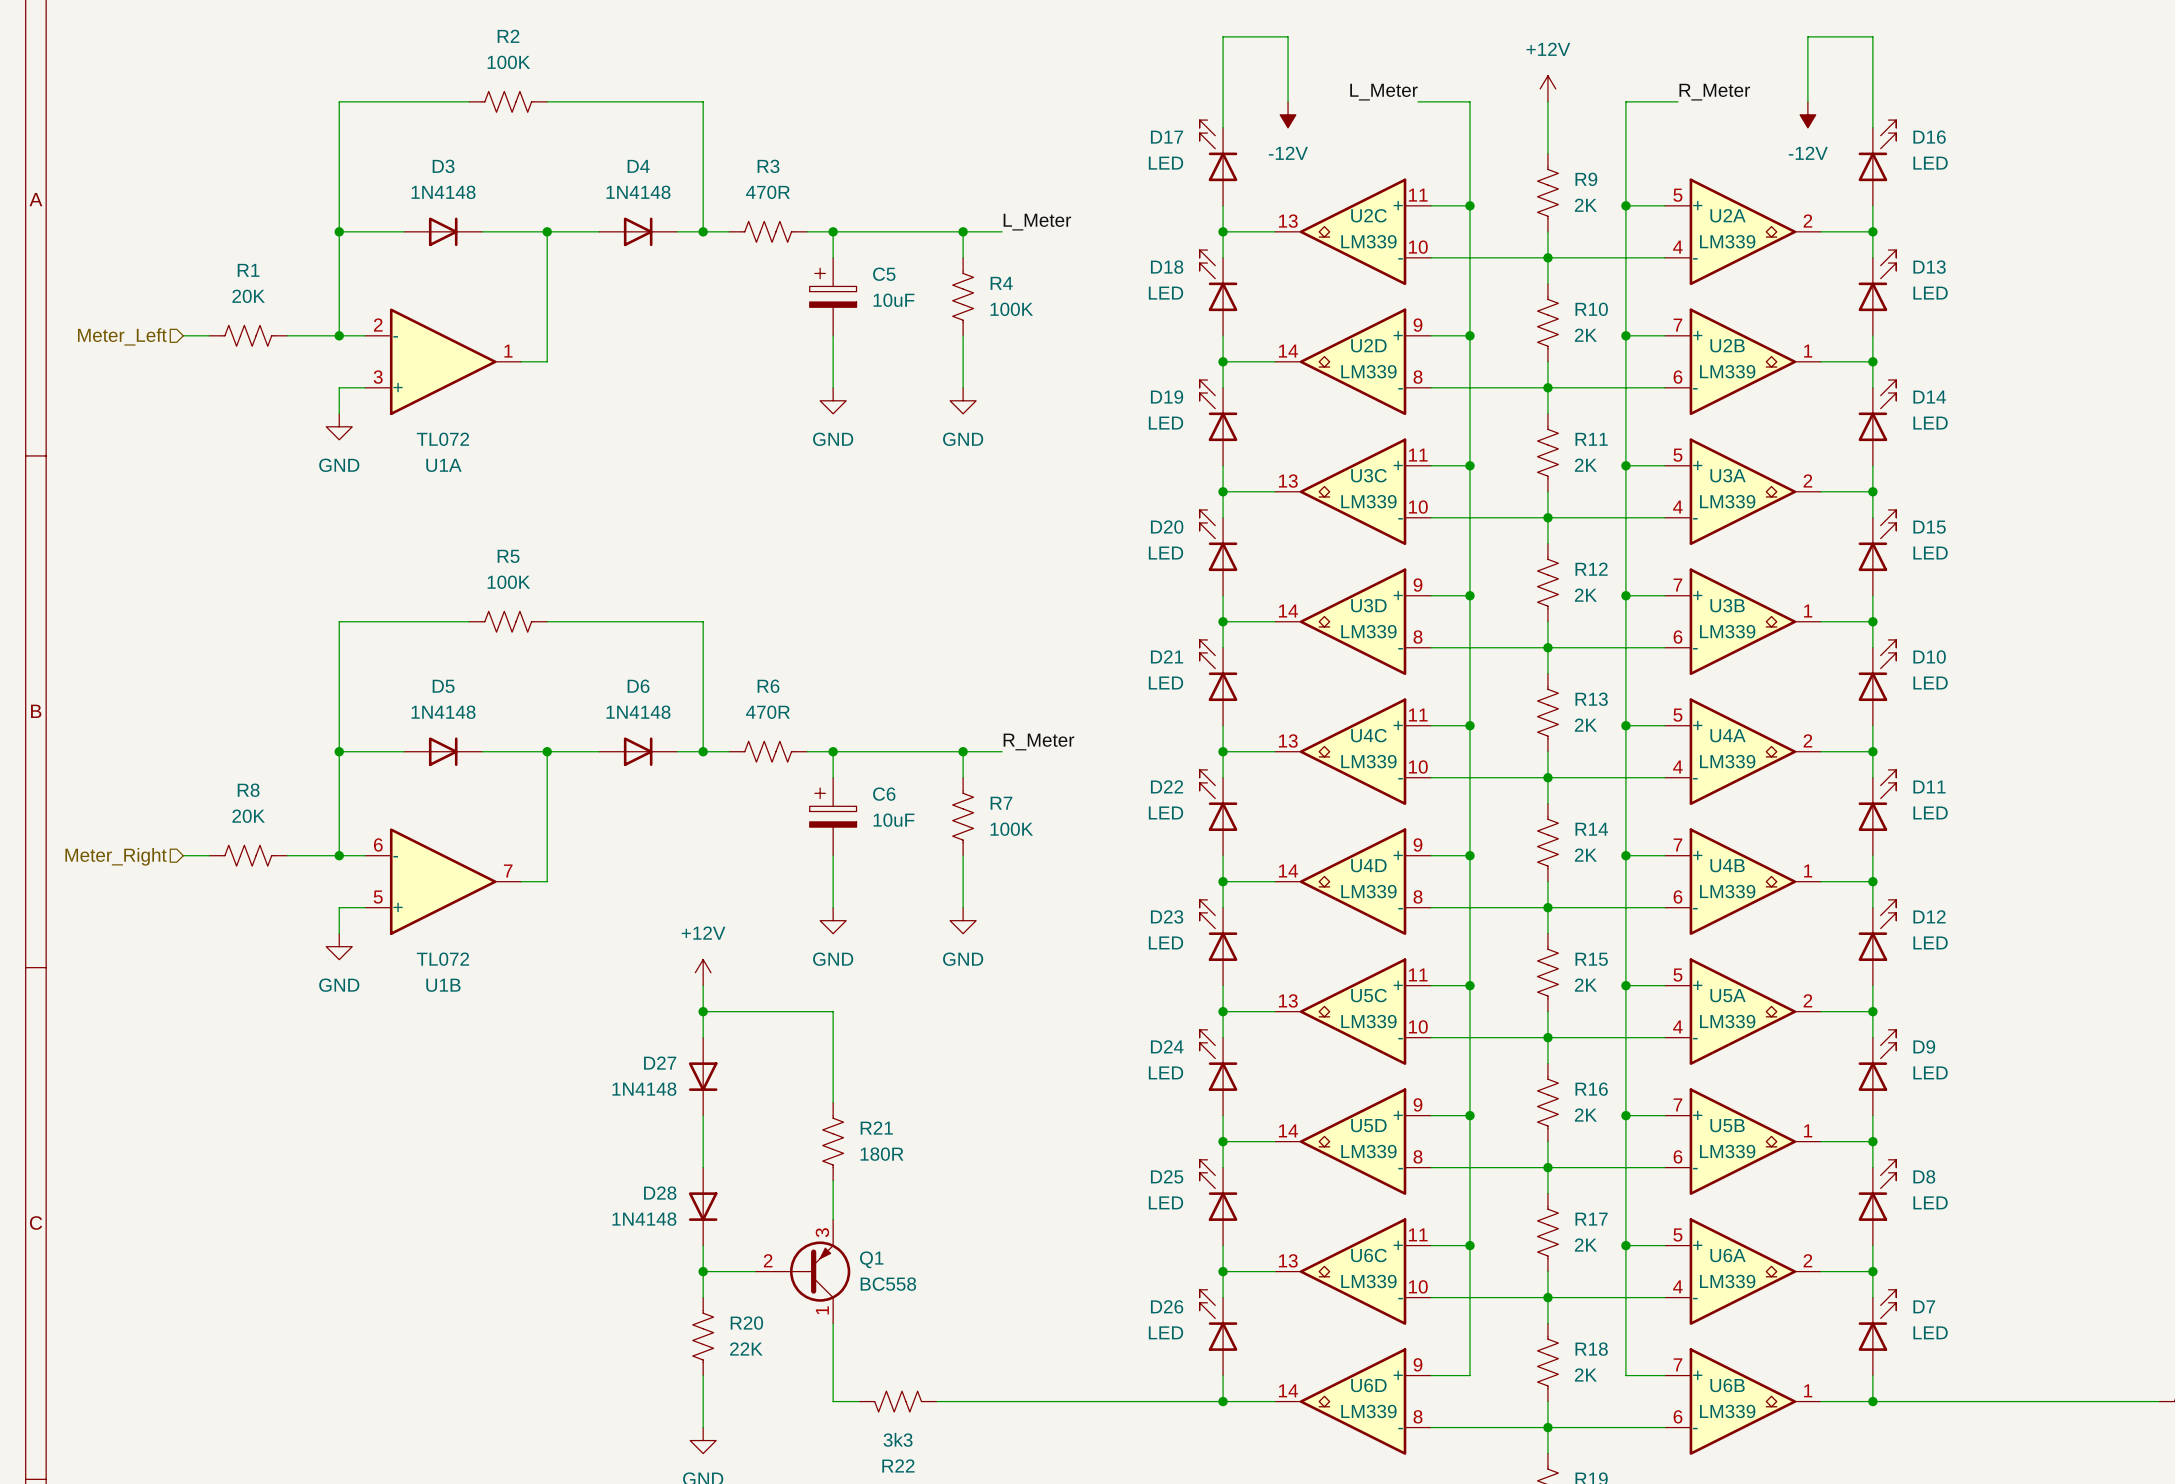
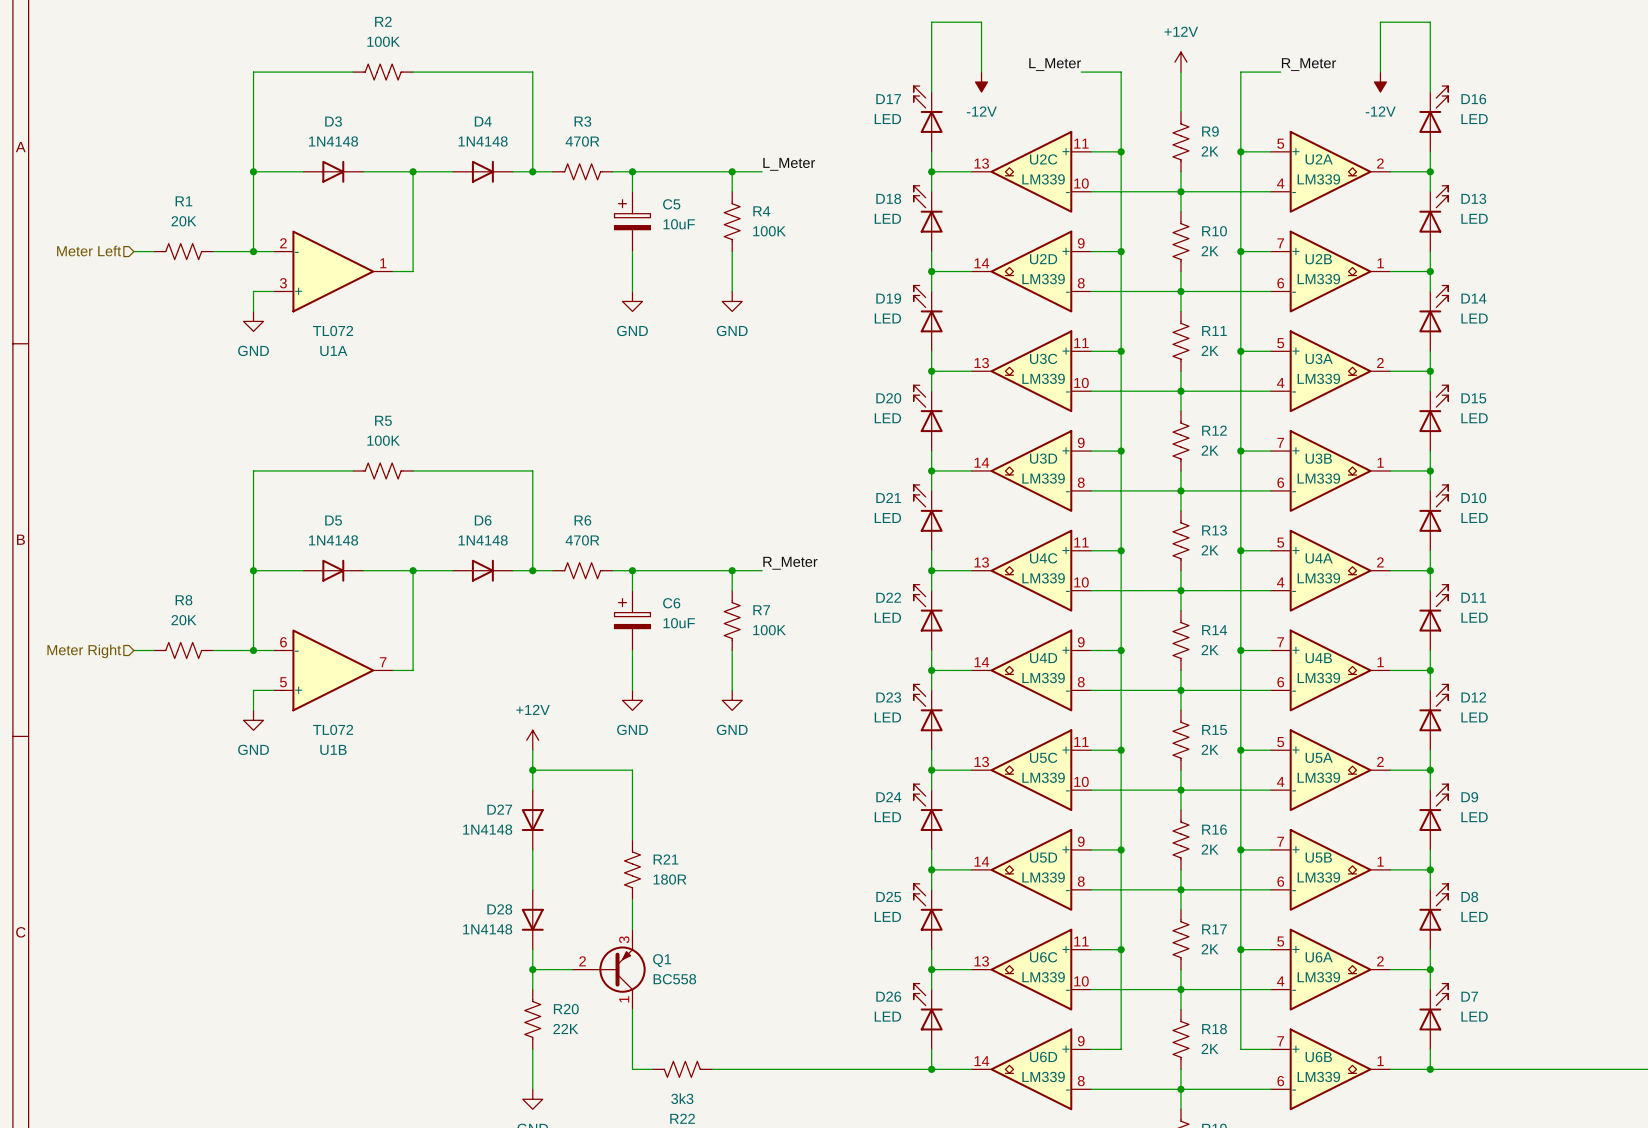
hierarchical label: Meter_Left (122, 336) -> Meter Left (89, 251)
hierarchical label: Meter_Right (116, 856) -> Meter Right (84, 651)

